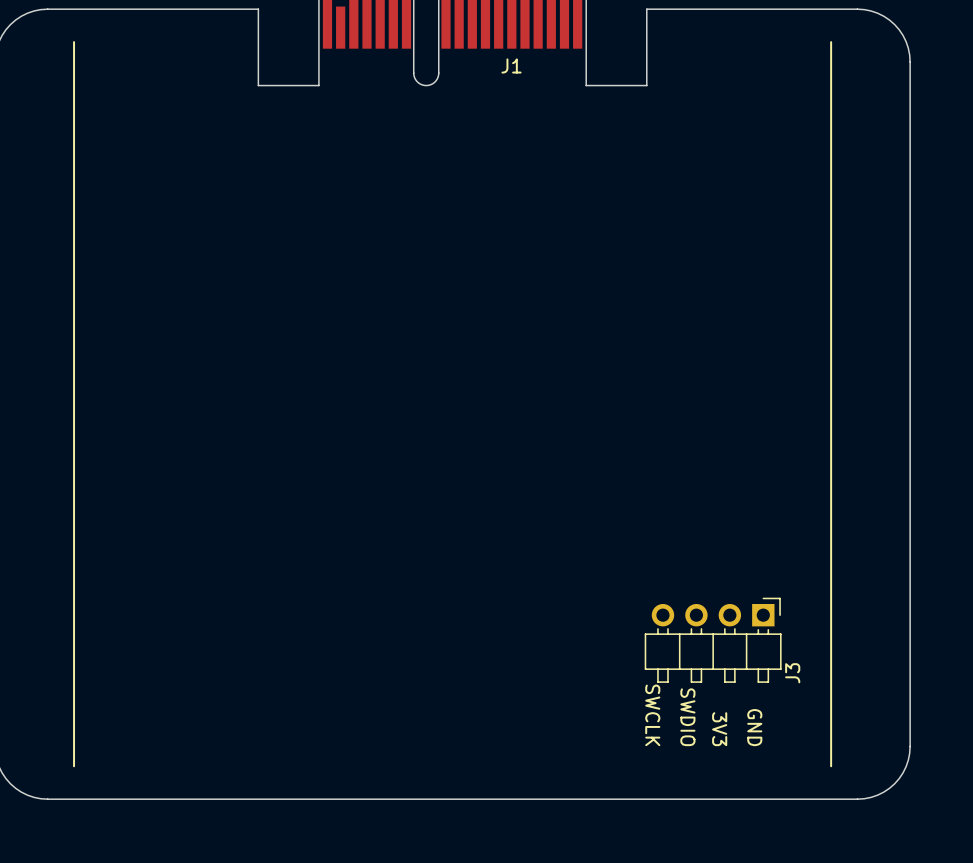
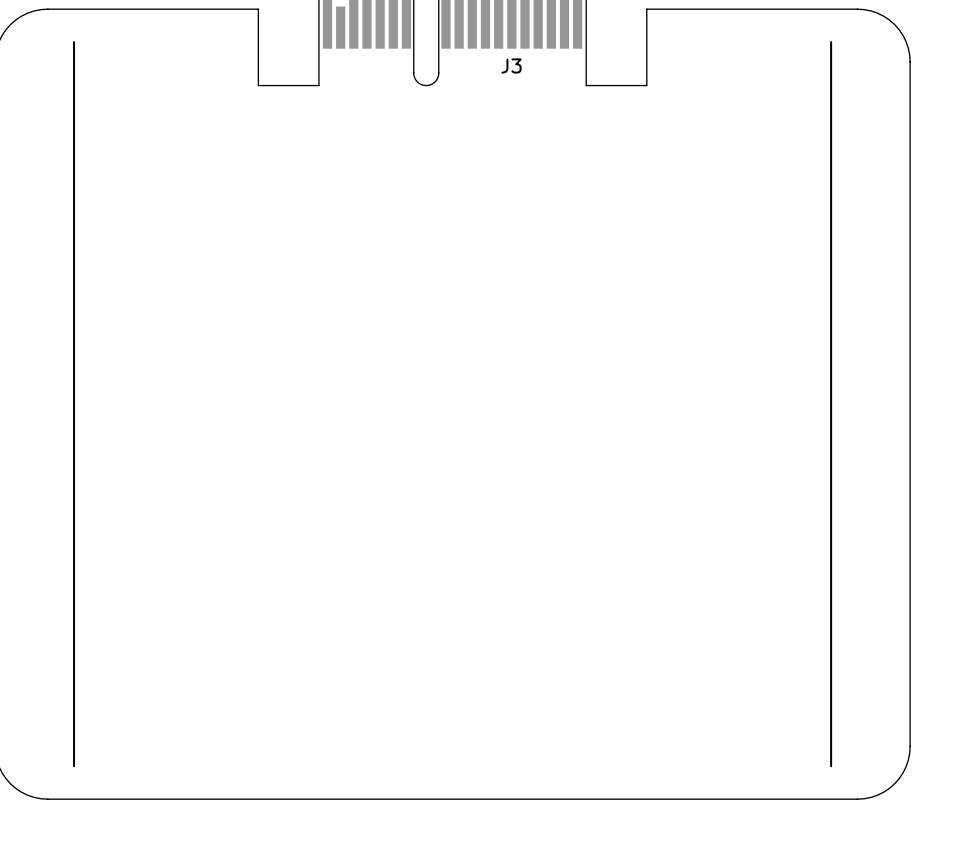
J1 name: J1 (511, 65) -> J3 (511, 65)
J3: (713, 640) -> none

